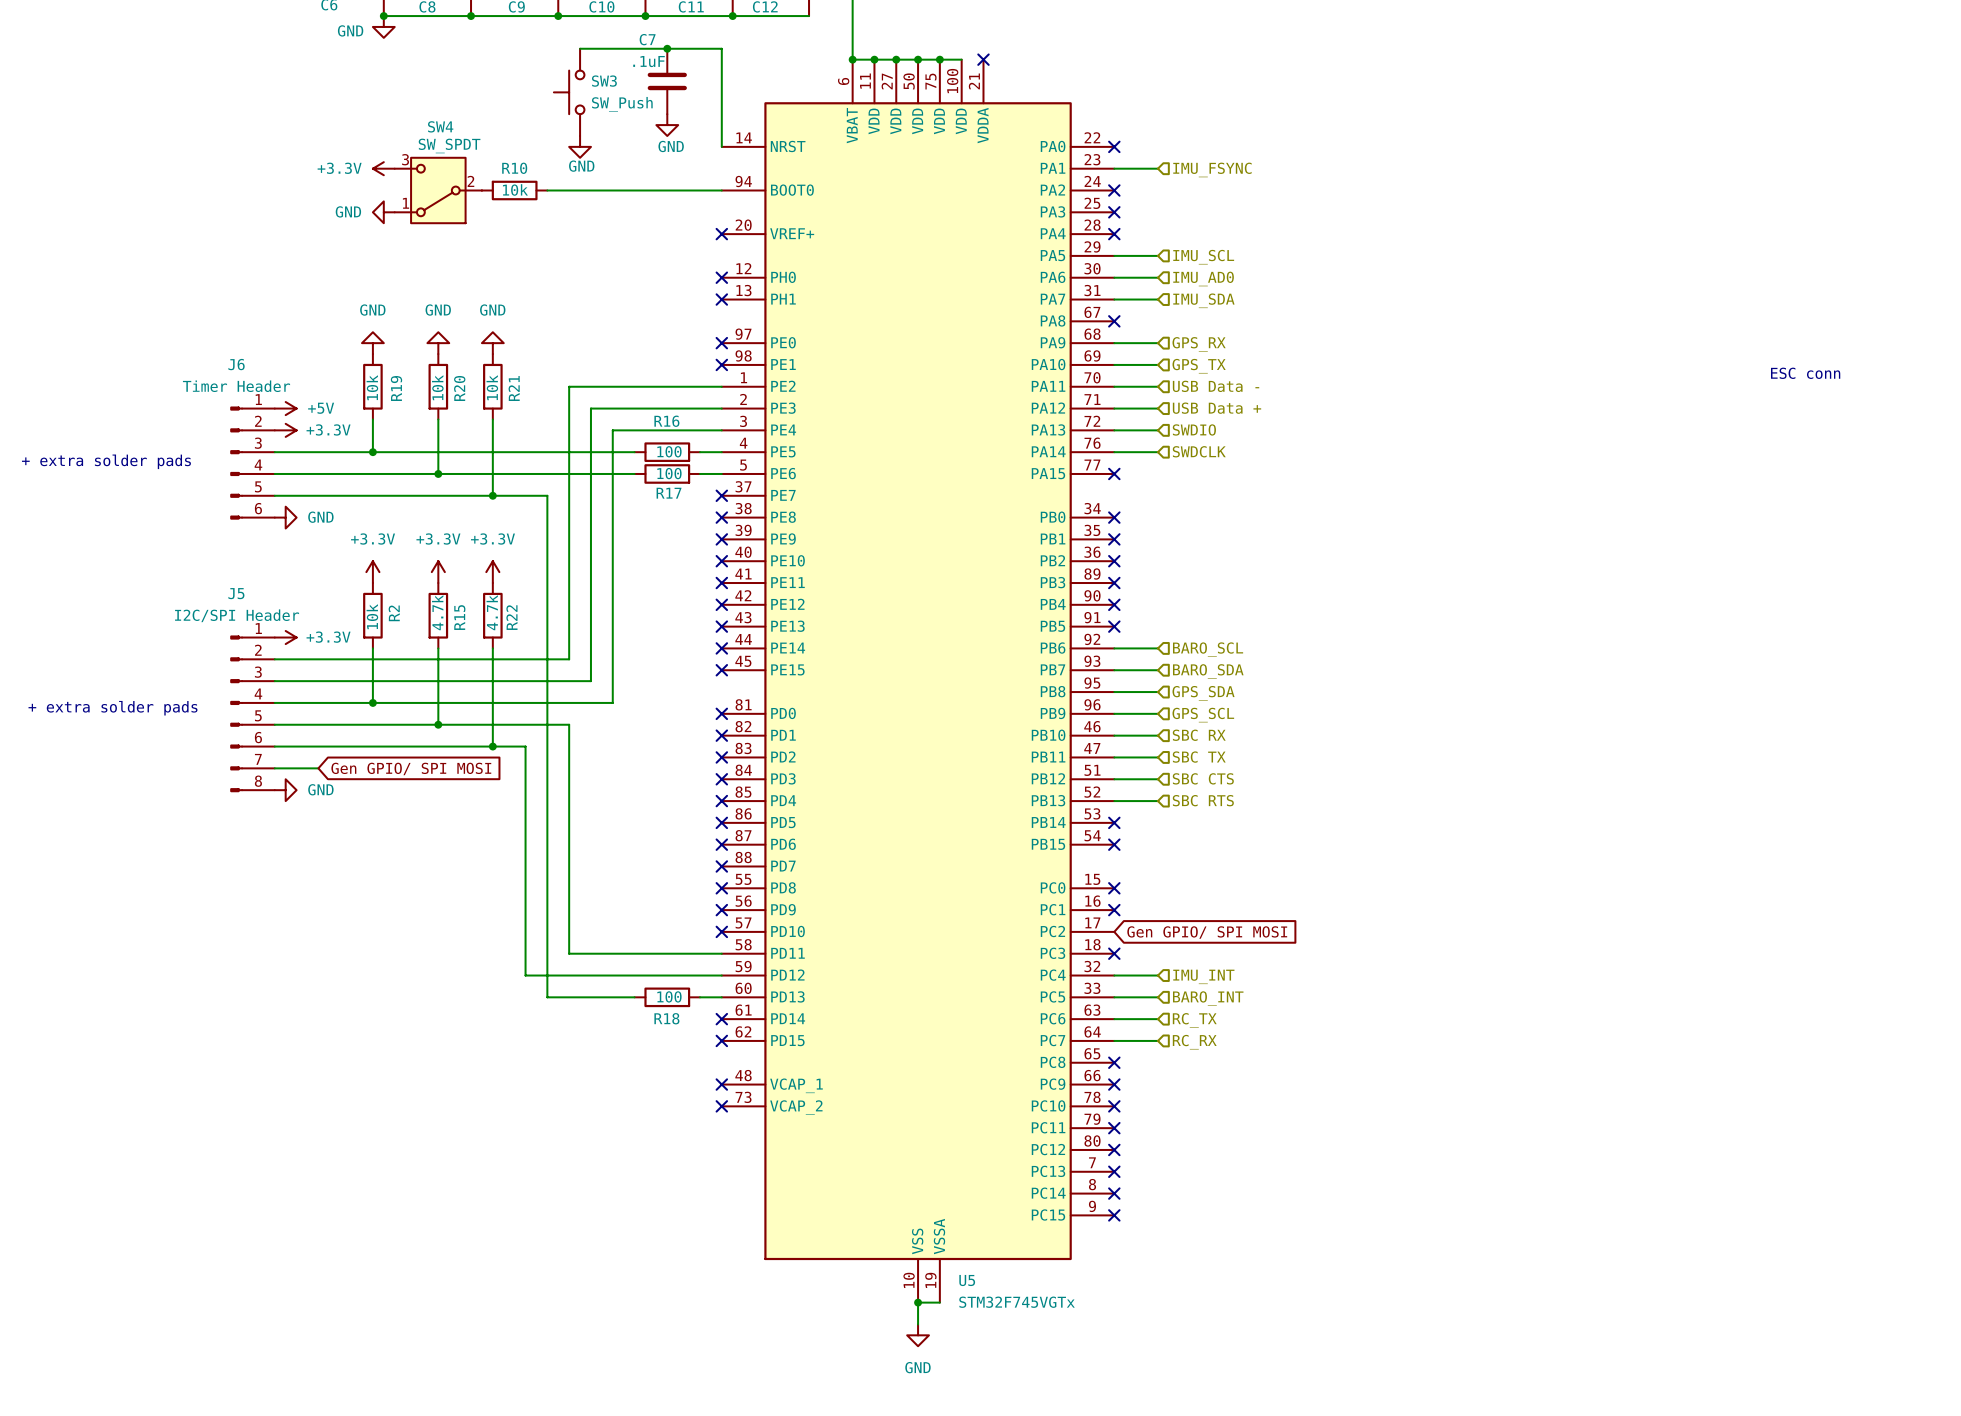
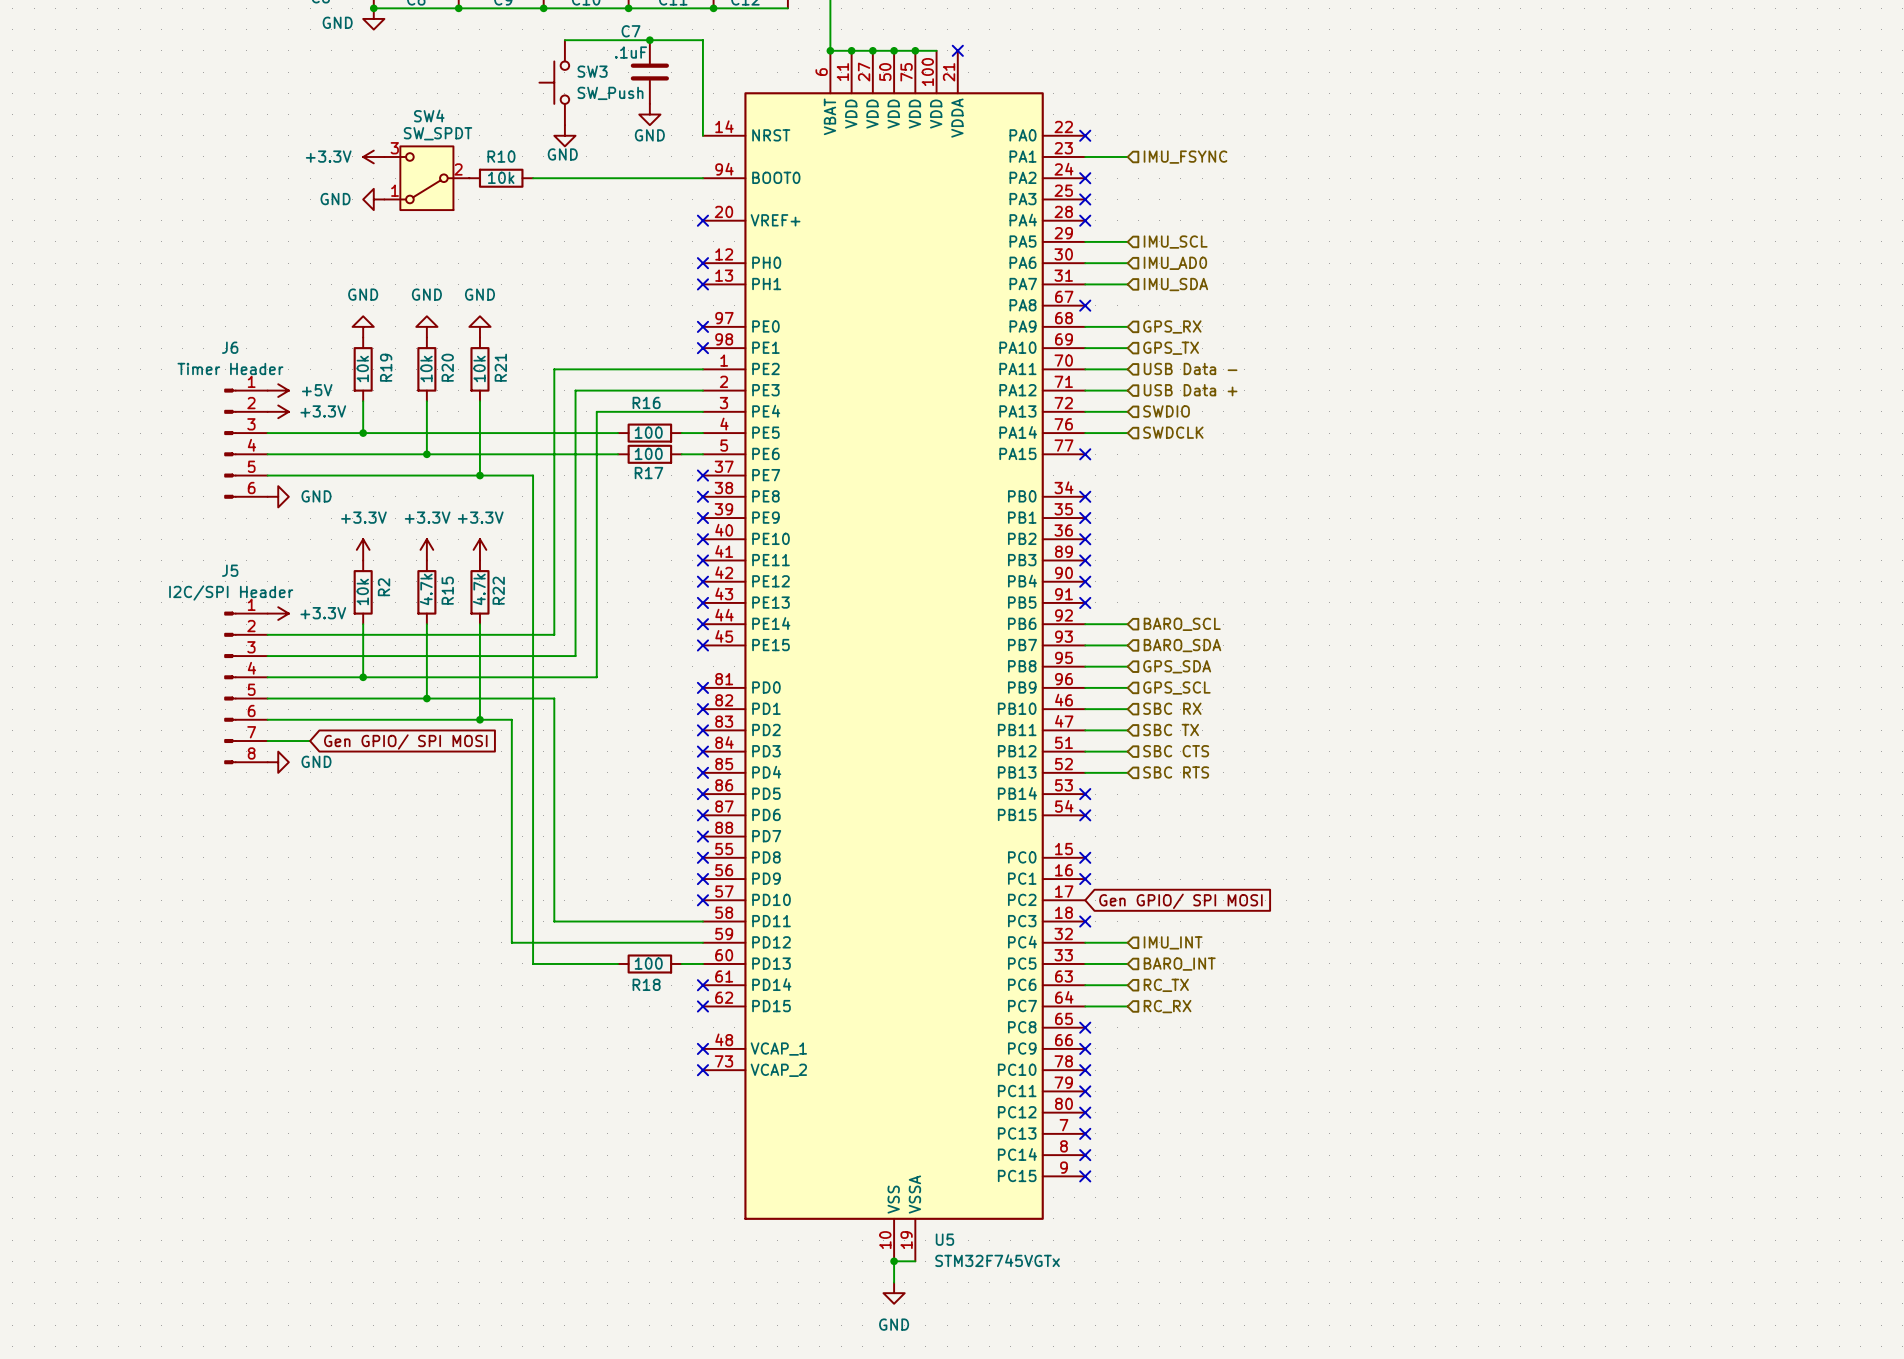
text: ESC conn (1805, 373) -> none
text: + extra solder pads (106, 461) -> none
text: + extra solder pads (112, 708) -> none

